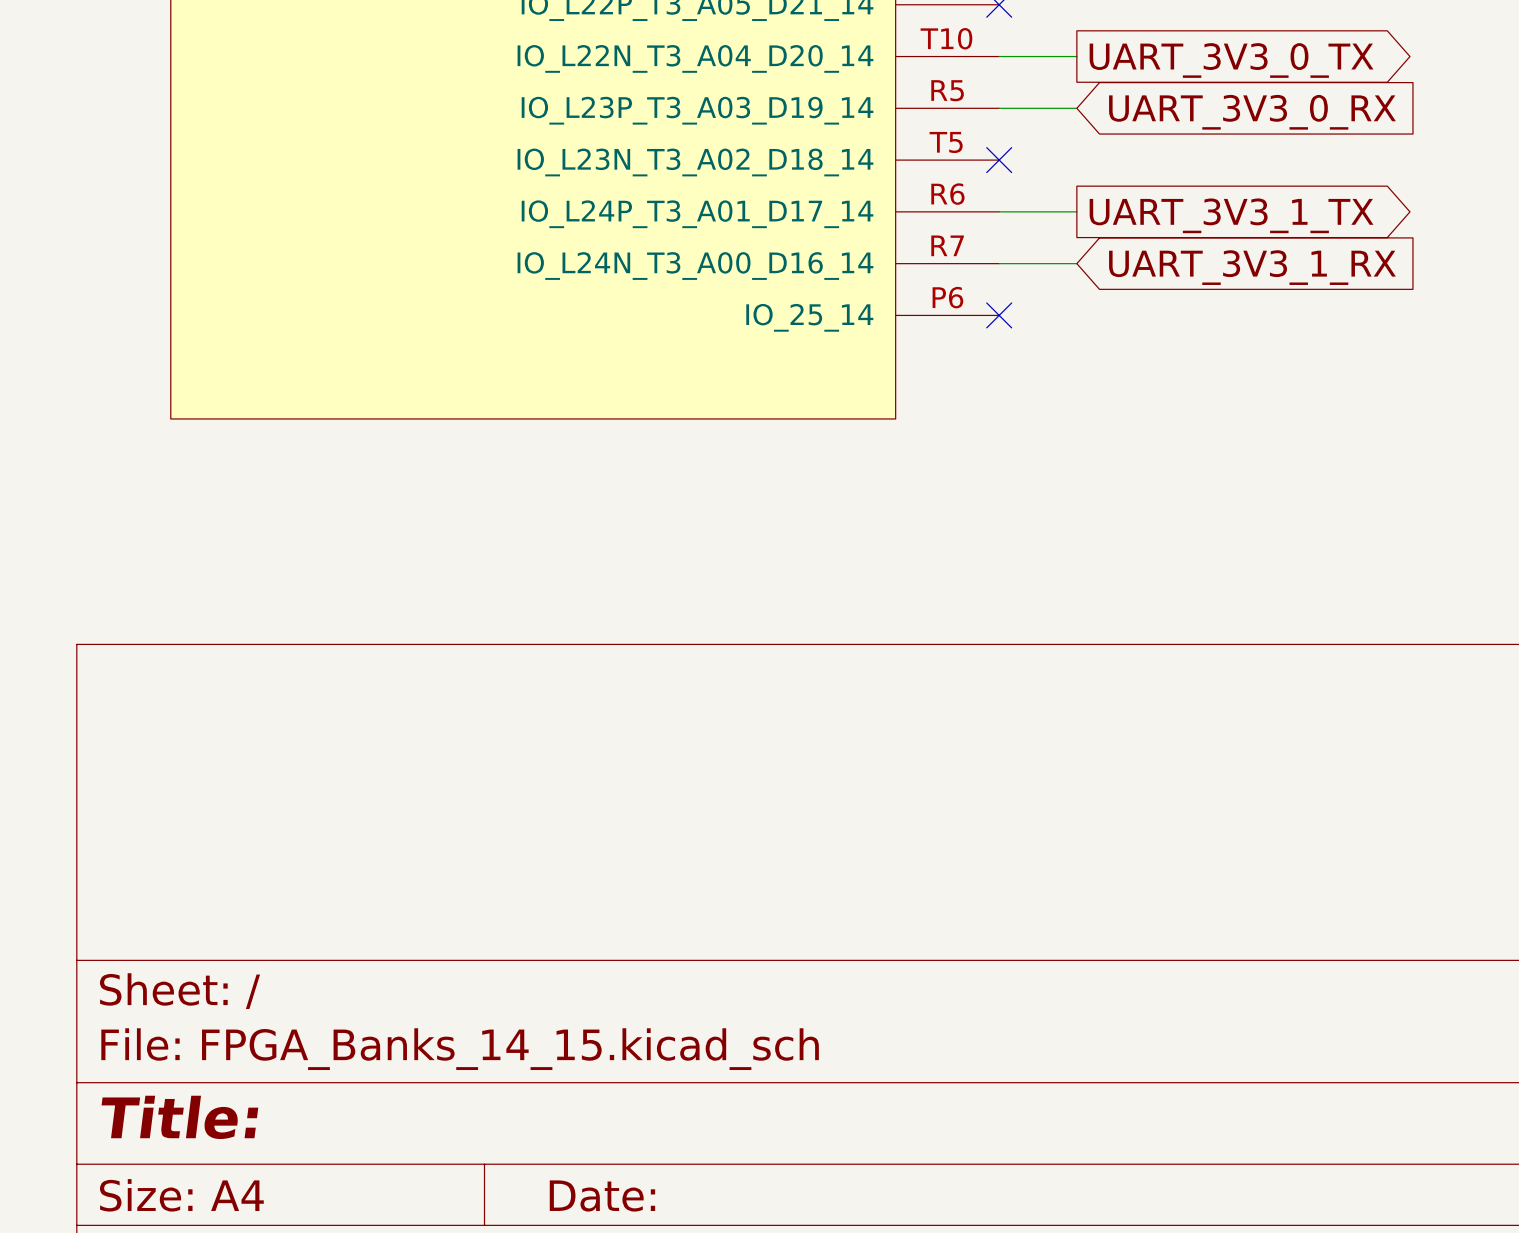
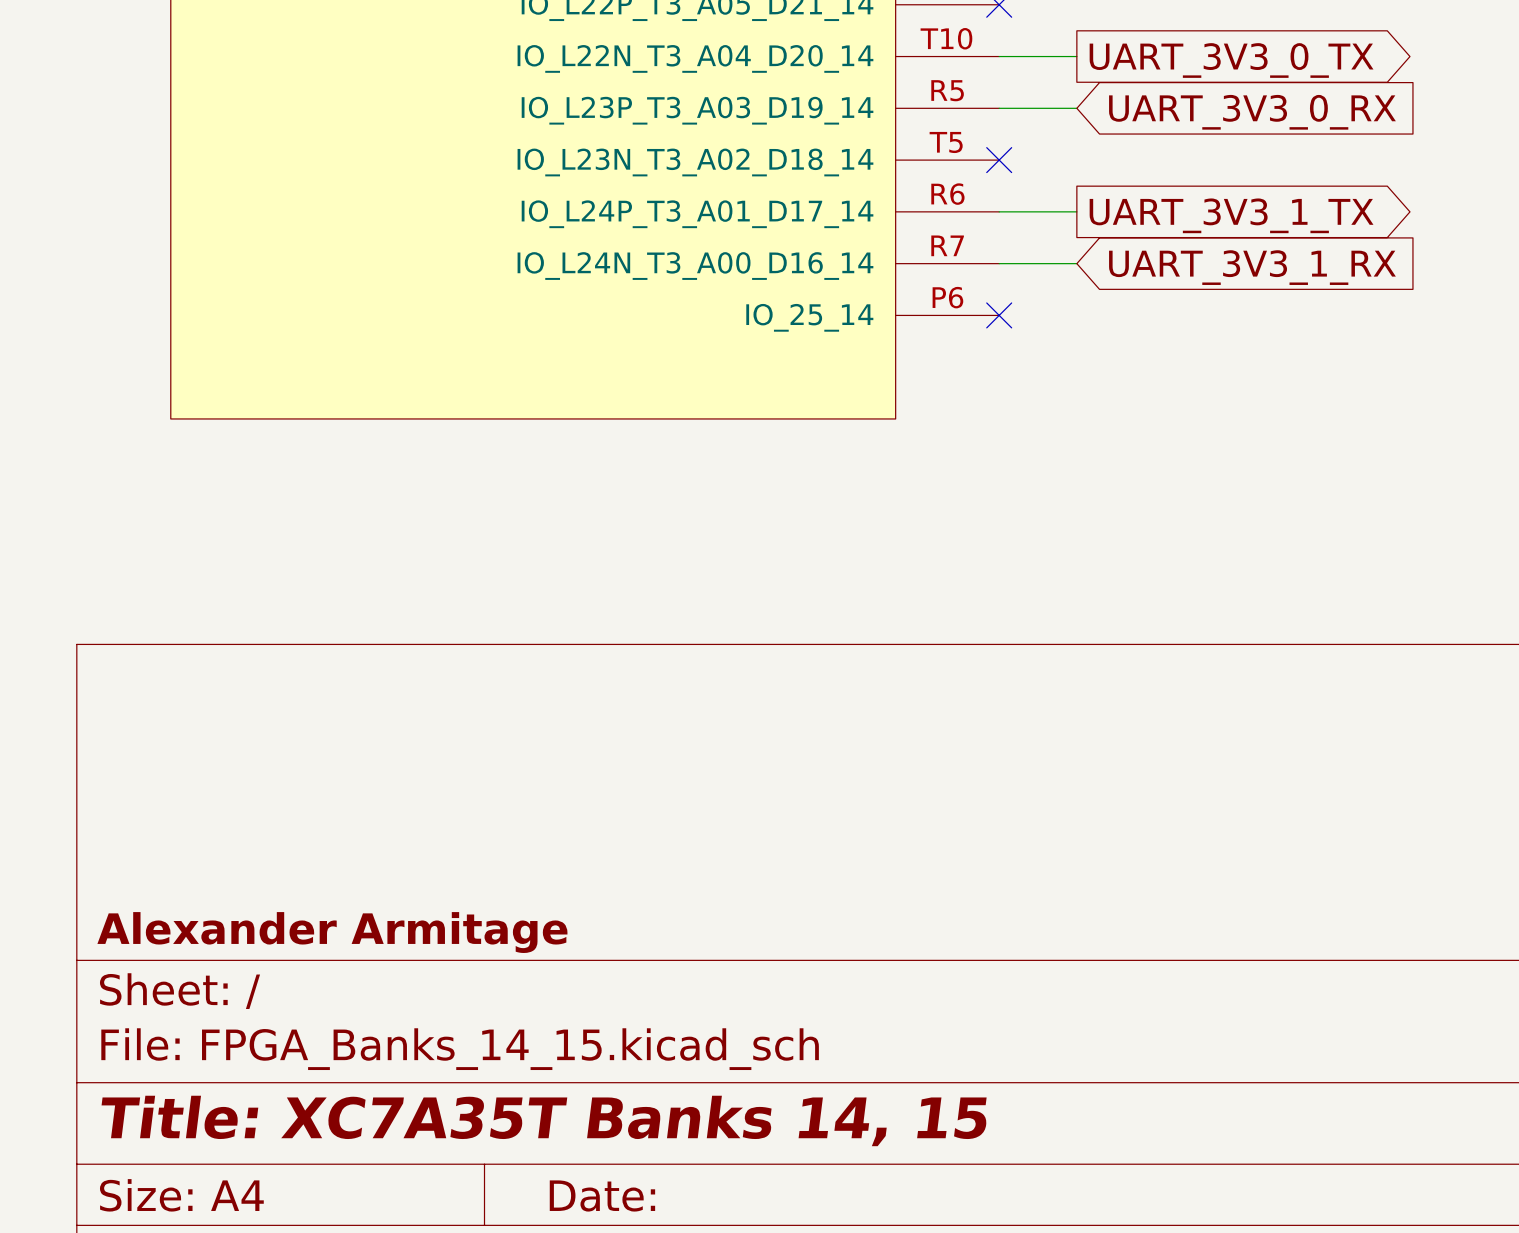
title block: none -> Alexander Armitage (332, 932)
title block: Title: (179, 1117) -> Title: XC7A35T Banks 14, 15 (544, 1120)

